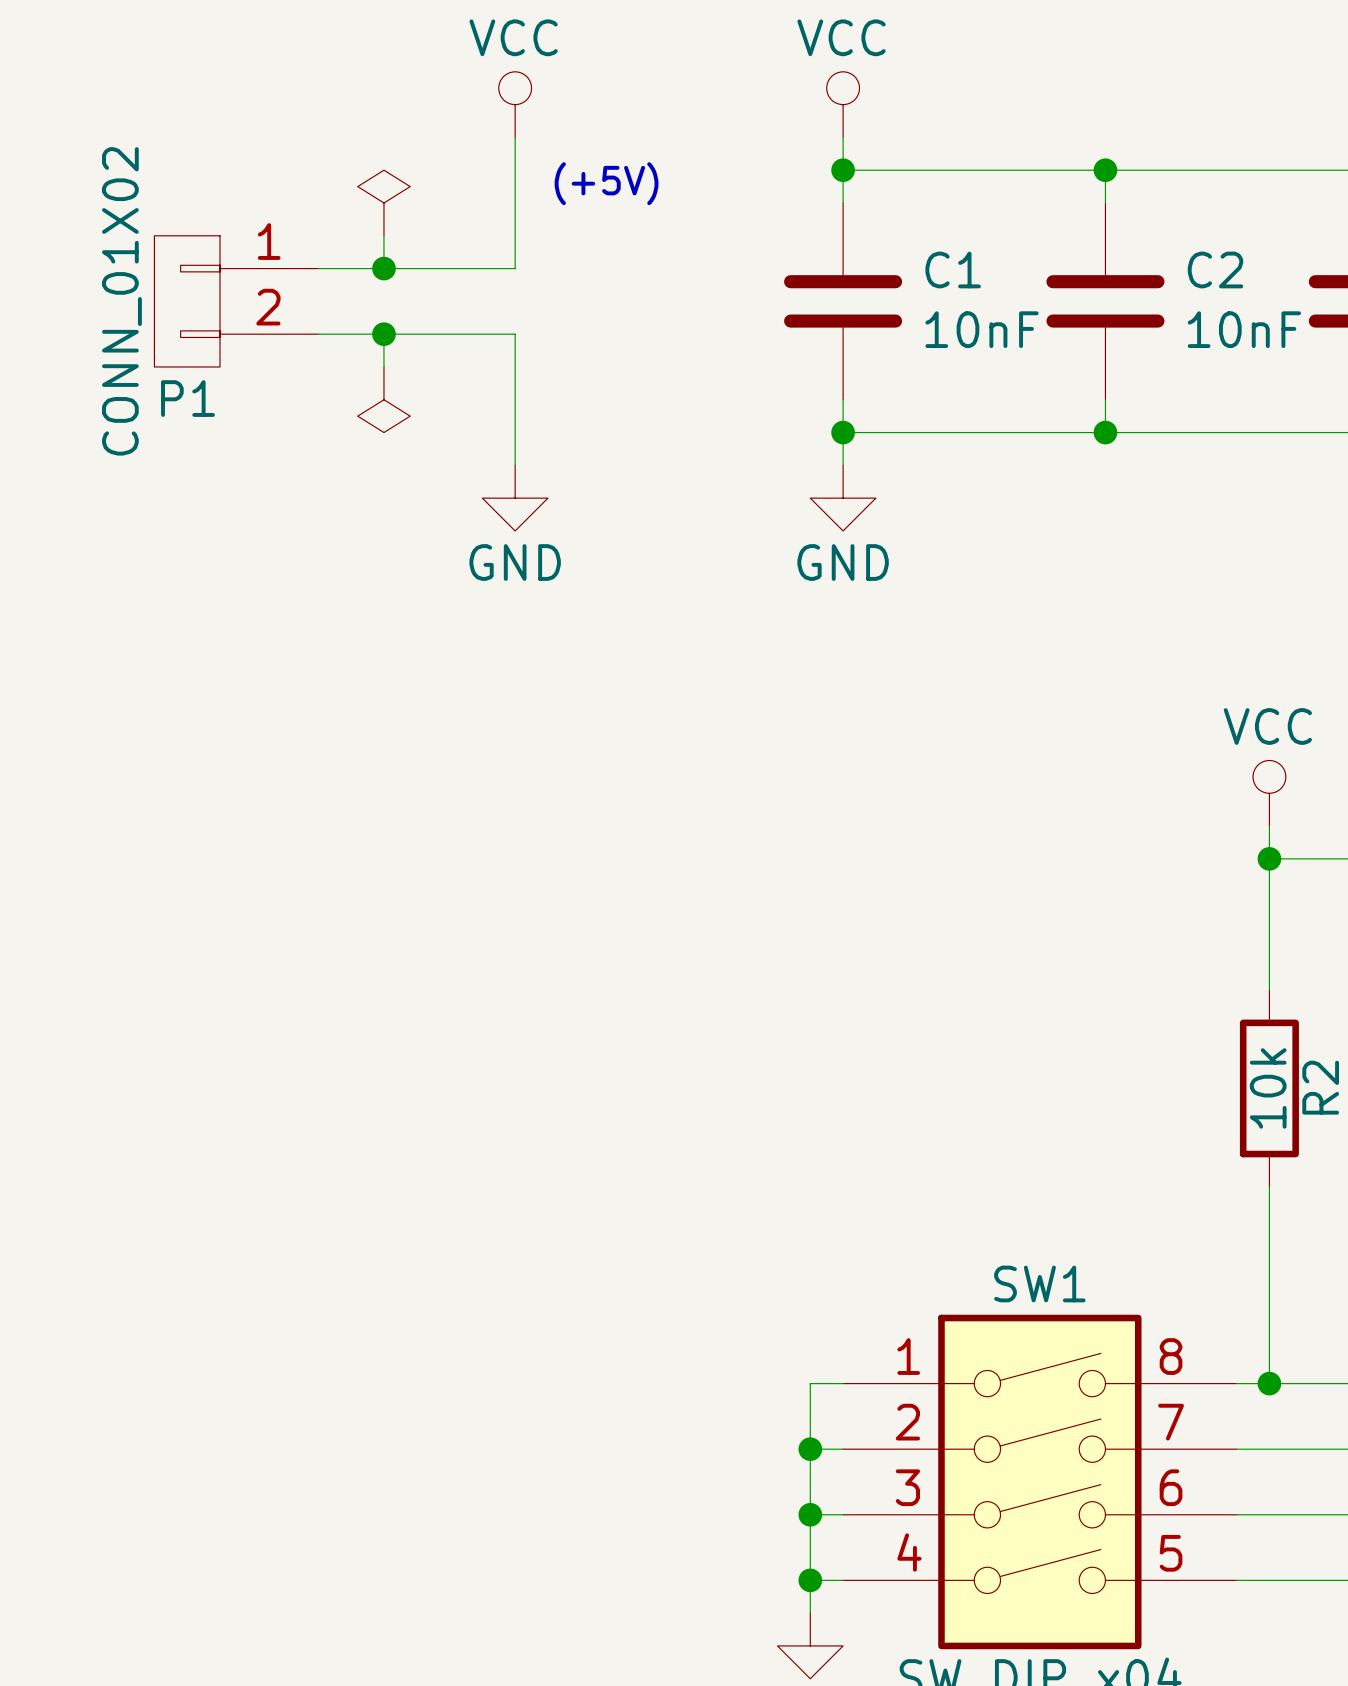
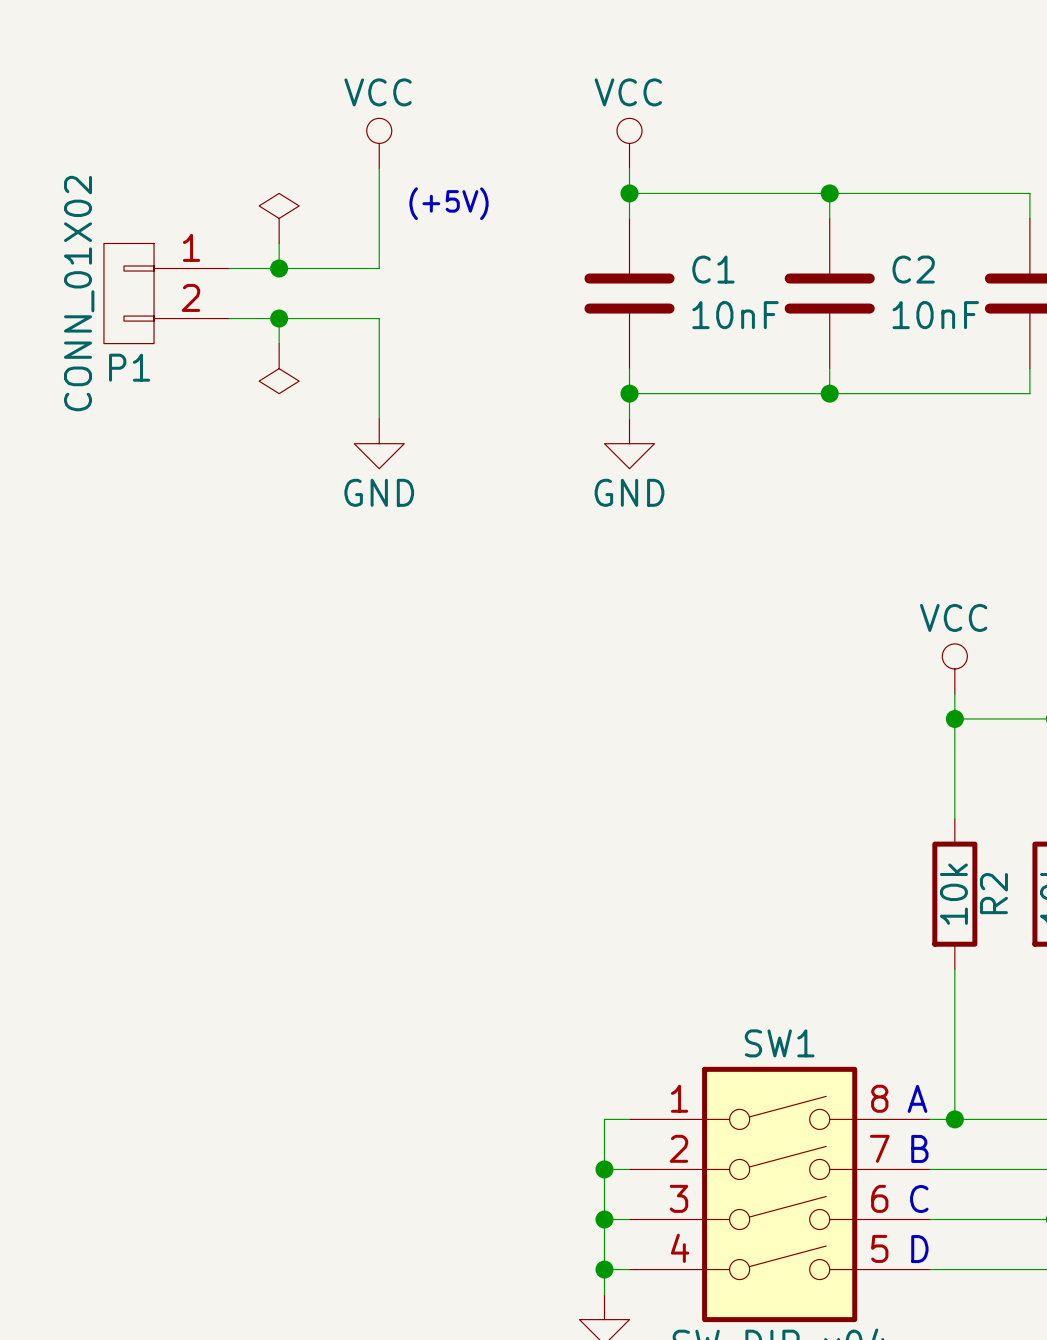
text: none -> A (917, 1098)
text: none -> B (919, 1148)
text: none -> C (919, 1199)
text: none -> D (919, 1249)

